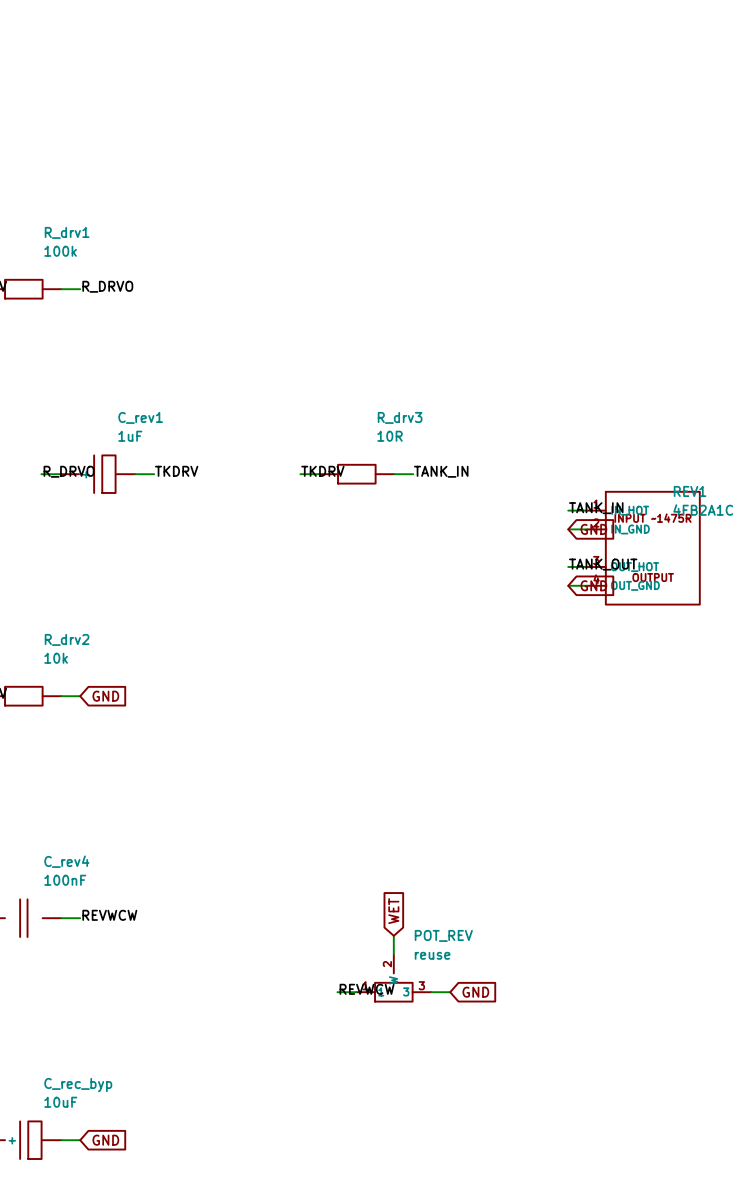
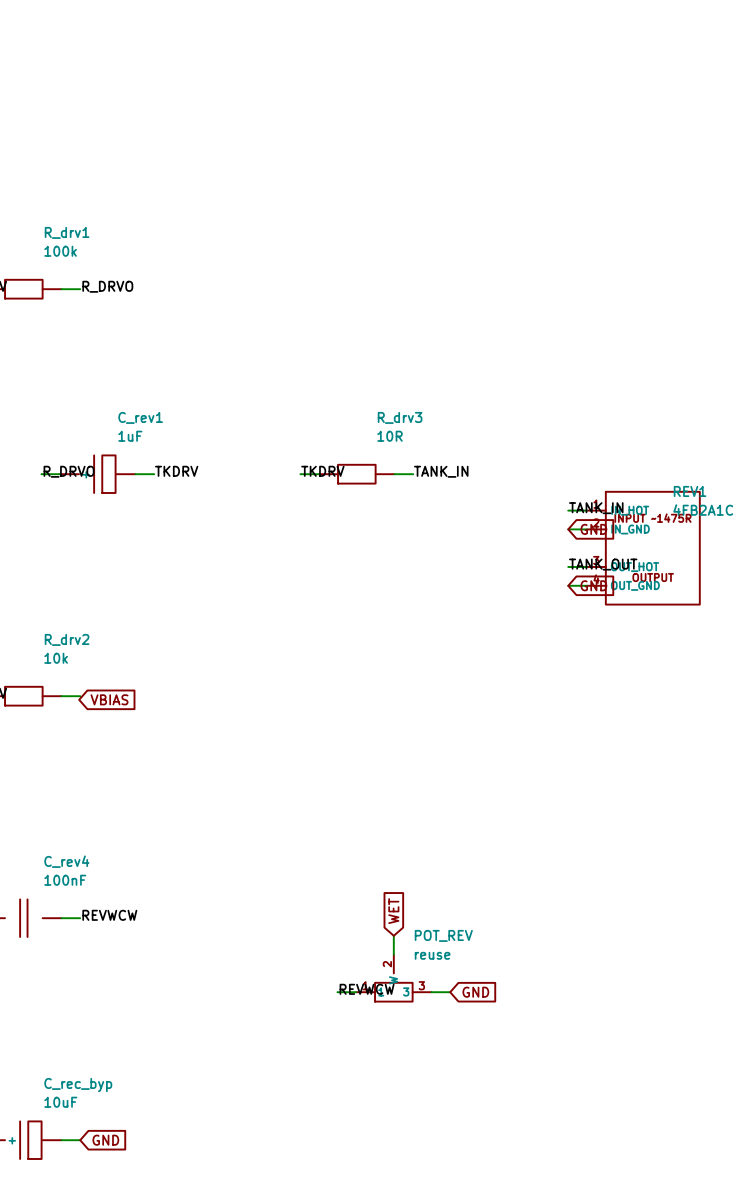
global label: GND (105, 696) -> VBIAS (109, 699)

